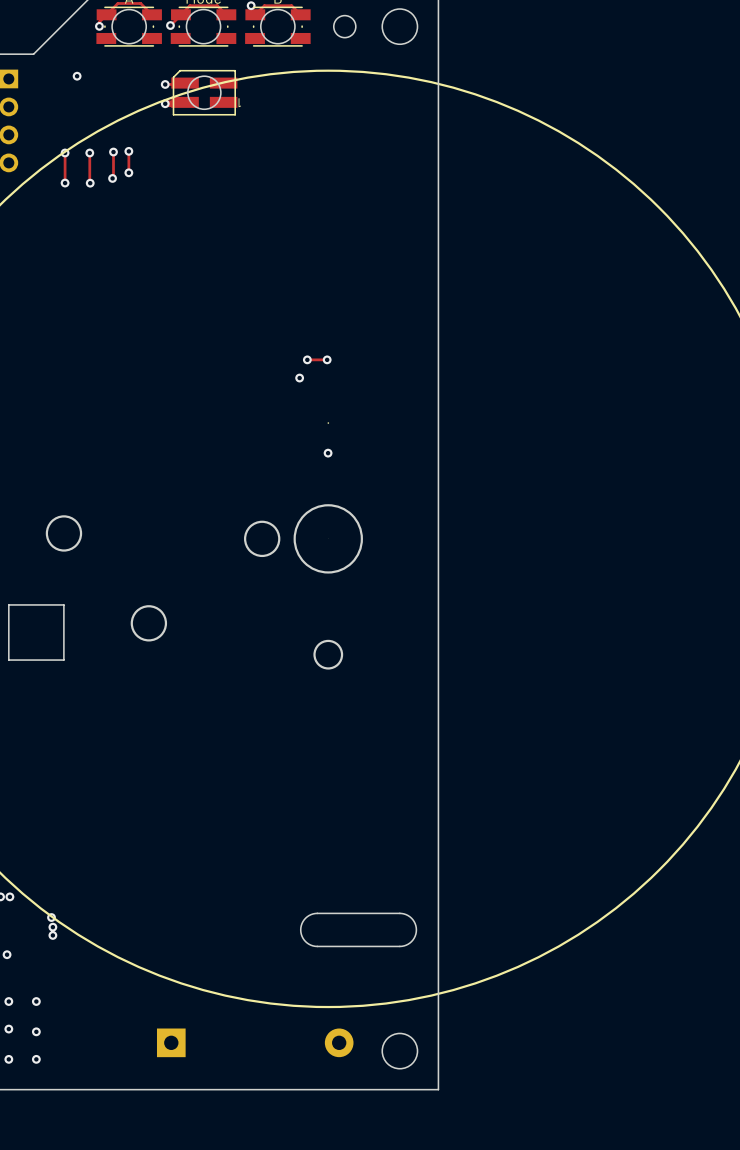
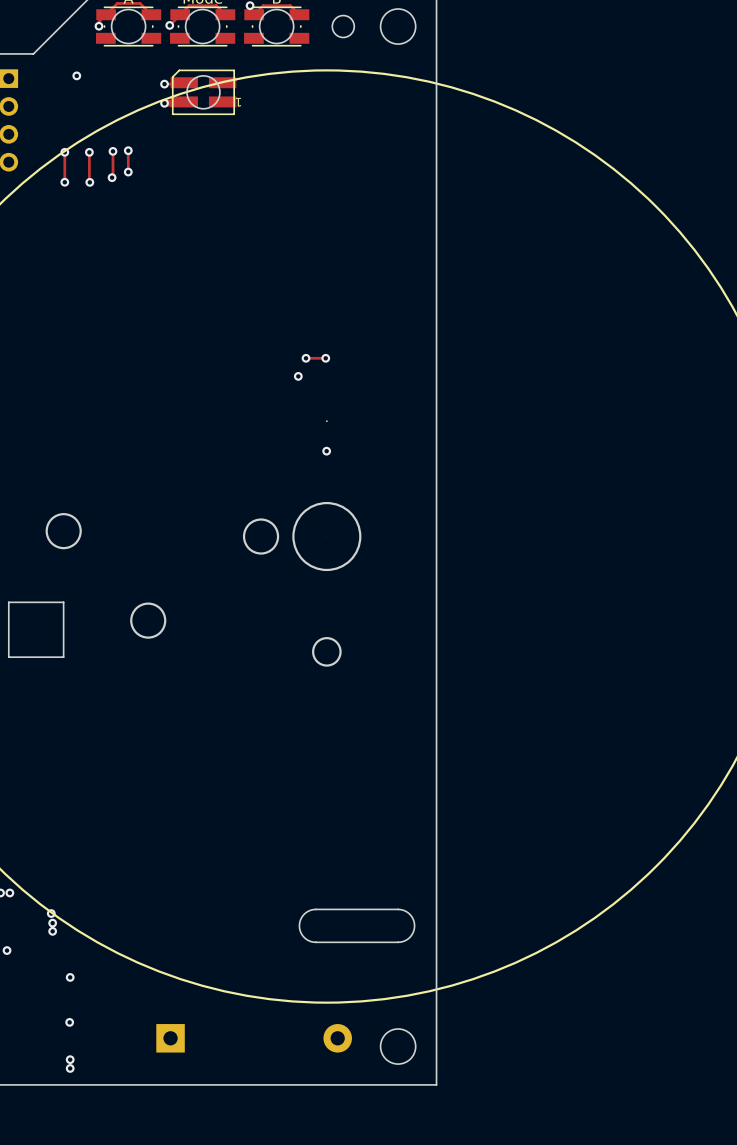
via: none -> (70, 977)
via: (8, 1001) -> none
via: (36, 1001) -> none
via: none -> (69, 1022)
via: (8, 1029) -> none
via: (36, 1031) -> none
via: (8, 1059) -> none
via: (36, 1059) -> none
via: none -> (70, 1059)
via: none -> (70, 1068)

